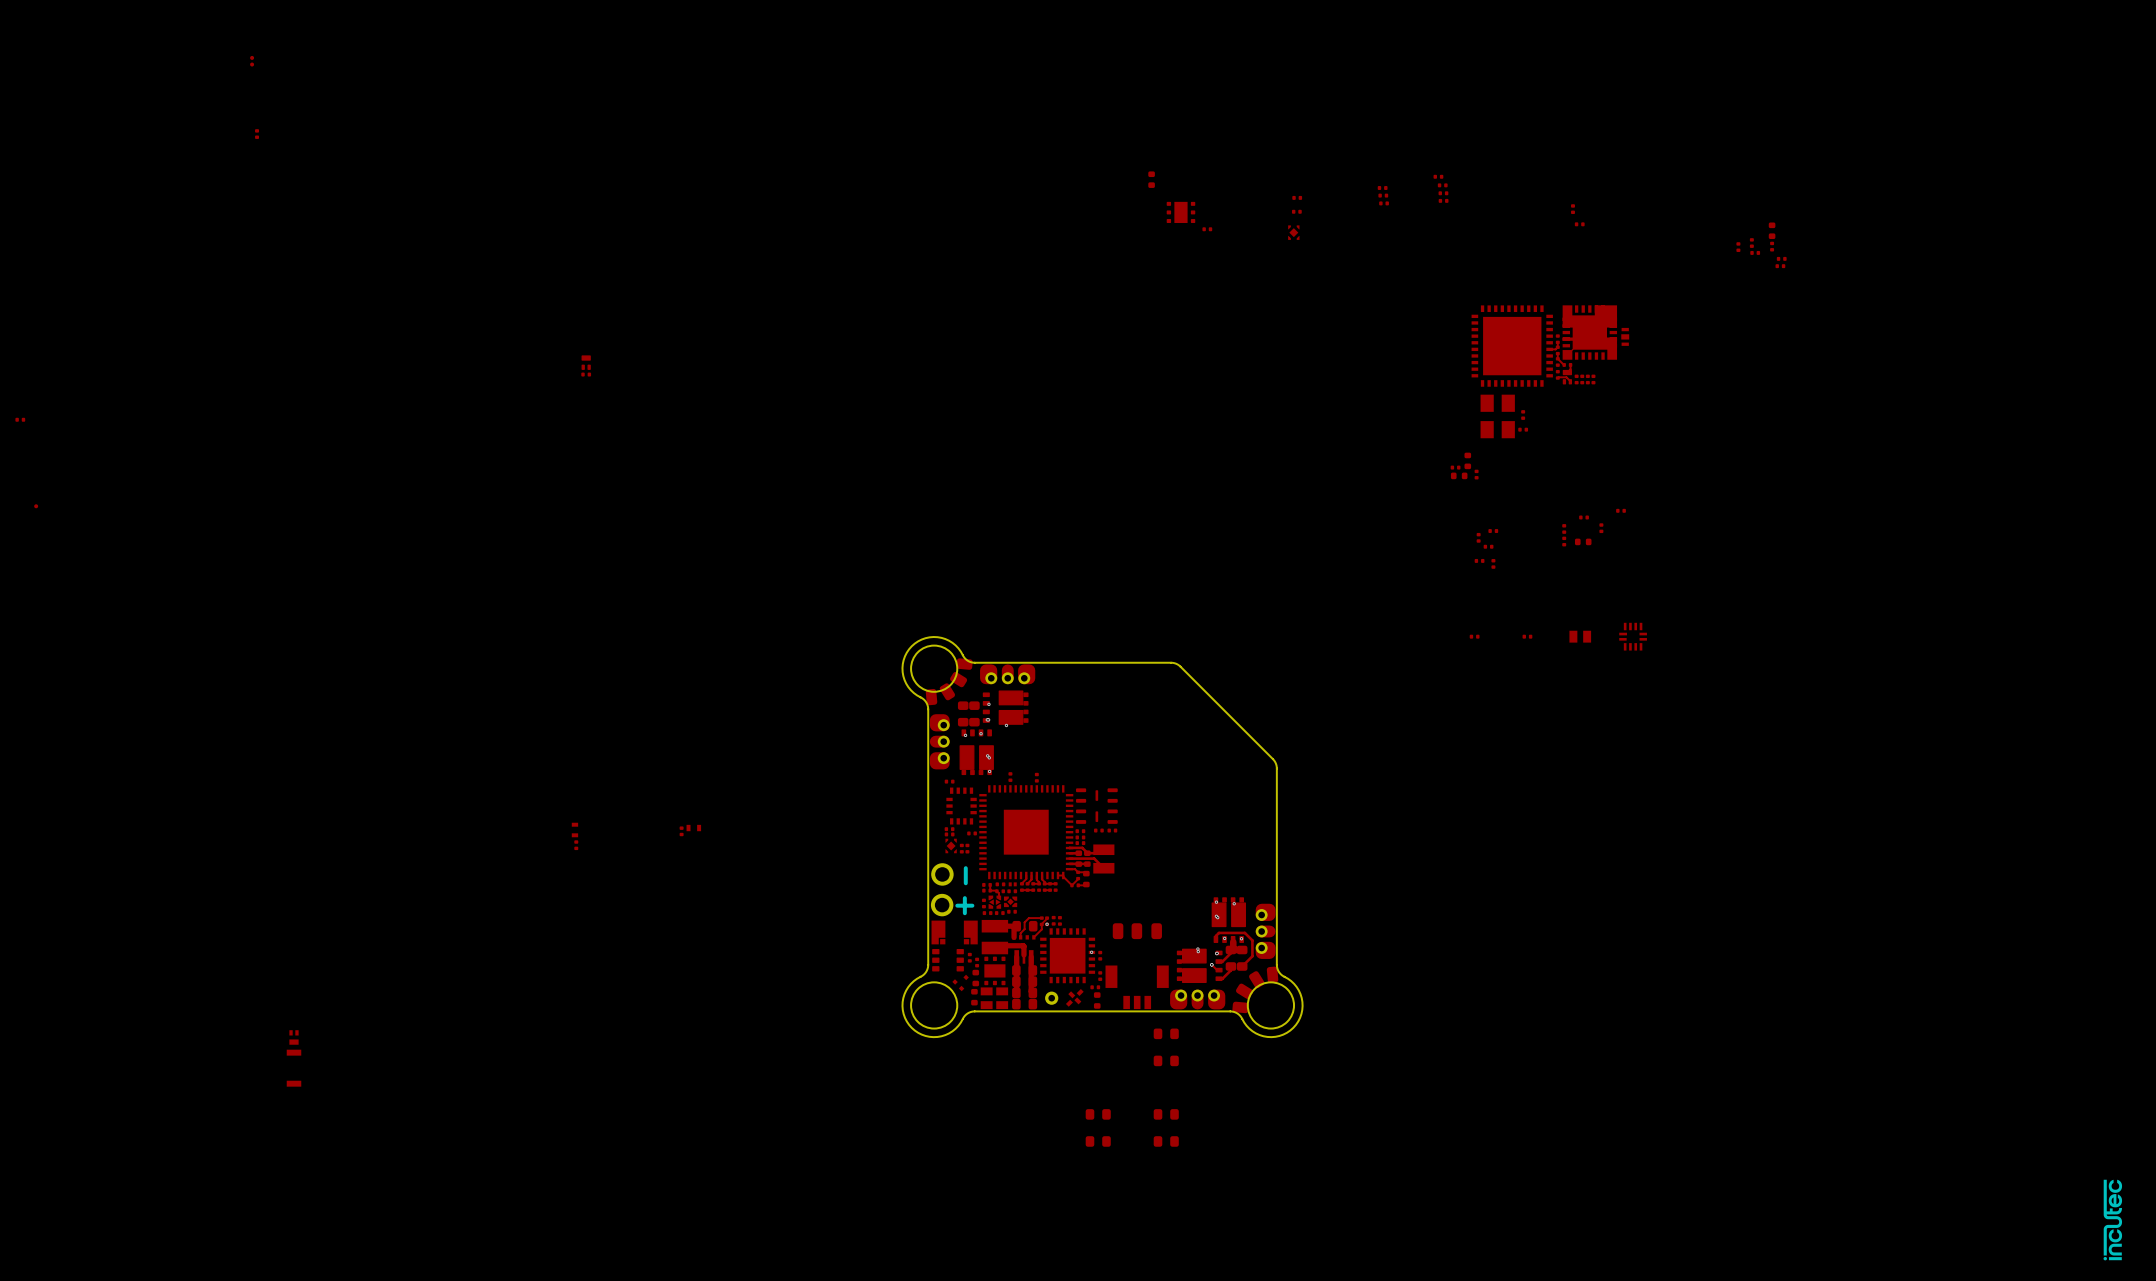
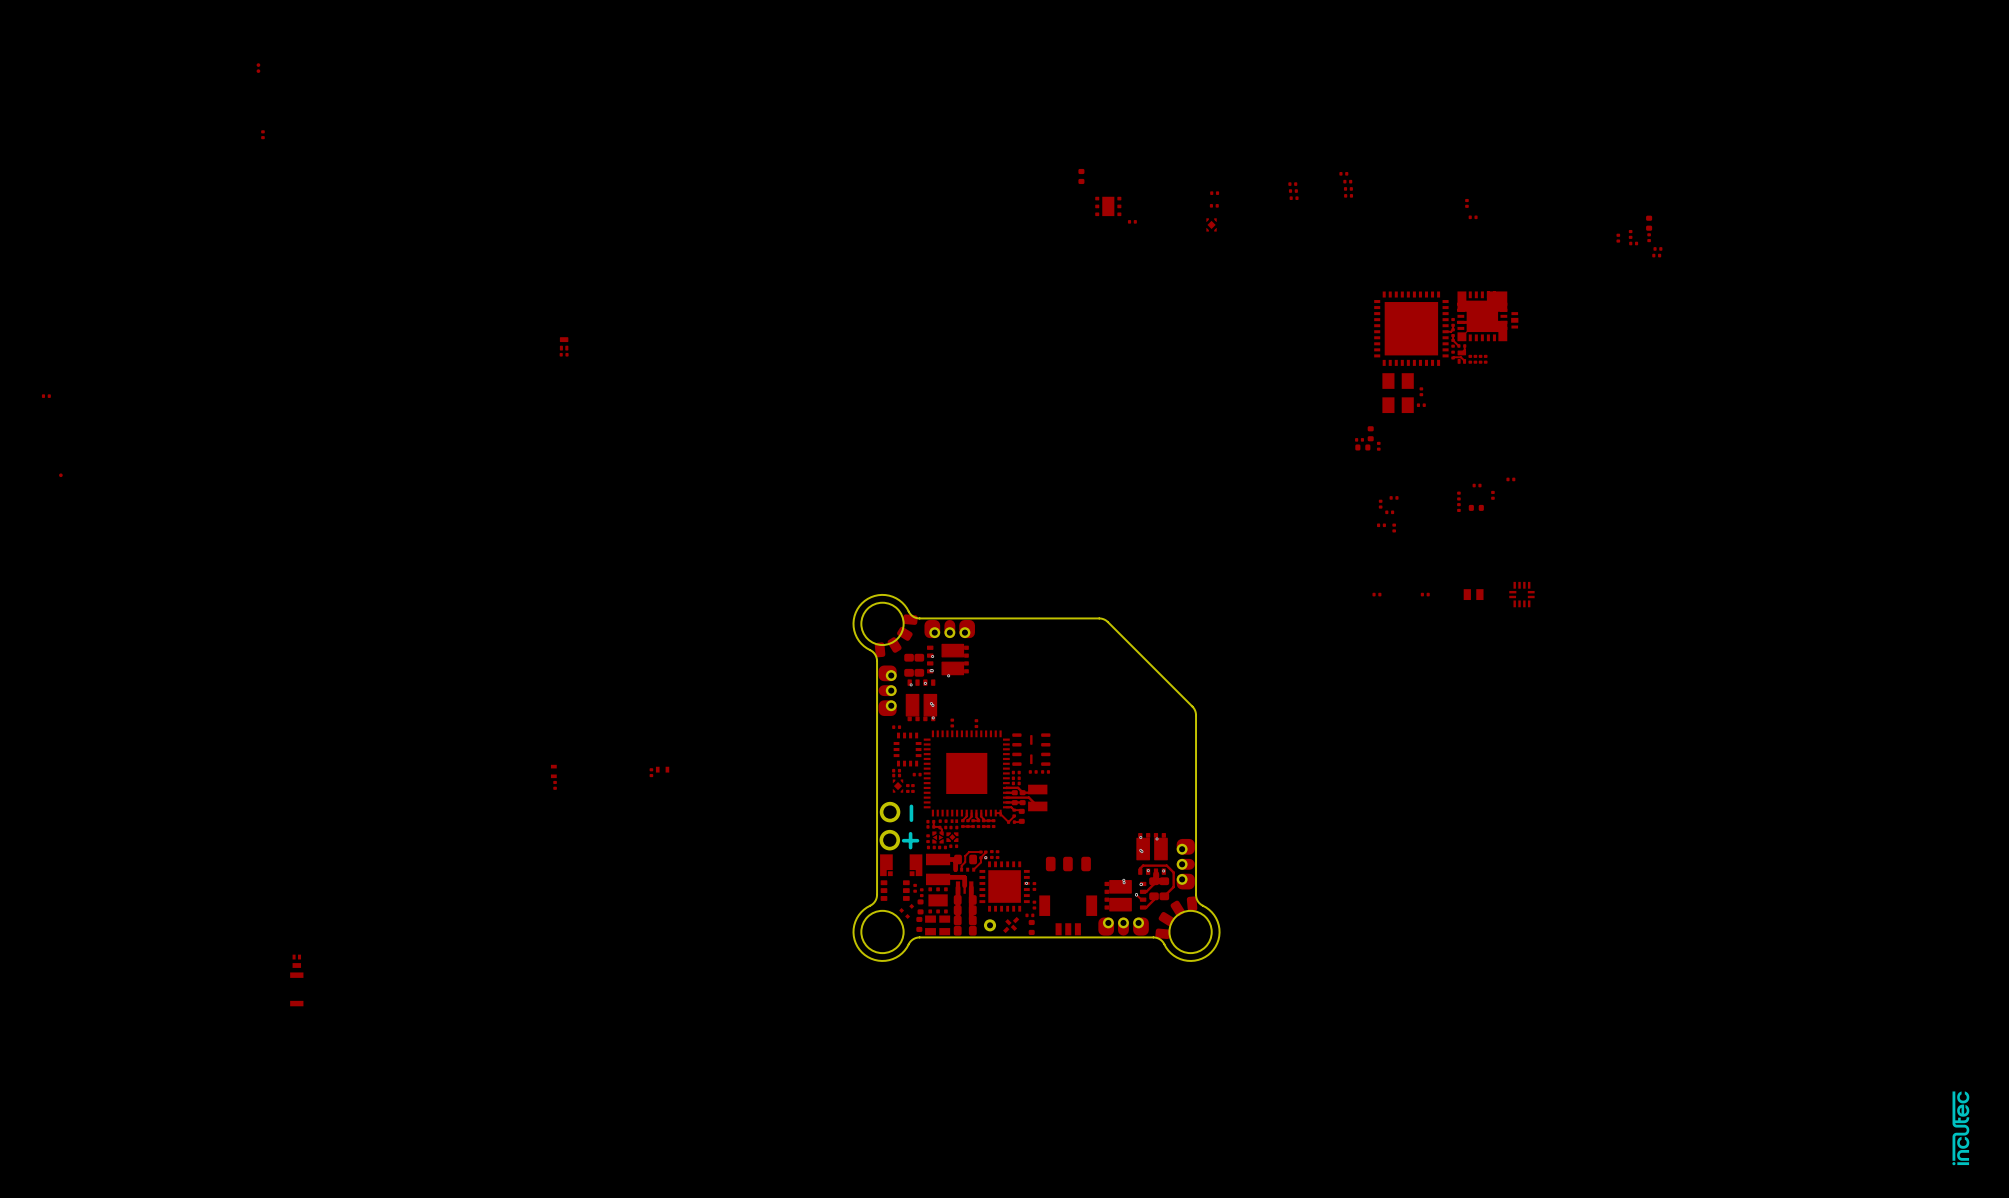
part: (1166, 1033) -> none
part: (1166, 1060) -> none
part: (1098, 1114) -> none
part: (1166, 1114) -> none
part: (1098, 1141) -> none
part: (1166, 1141) -> none

